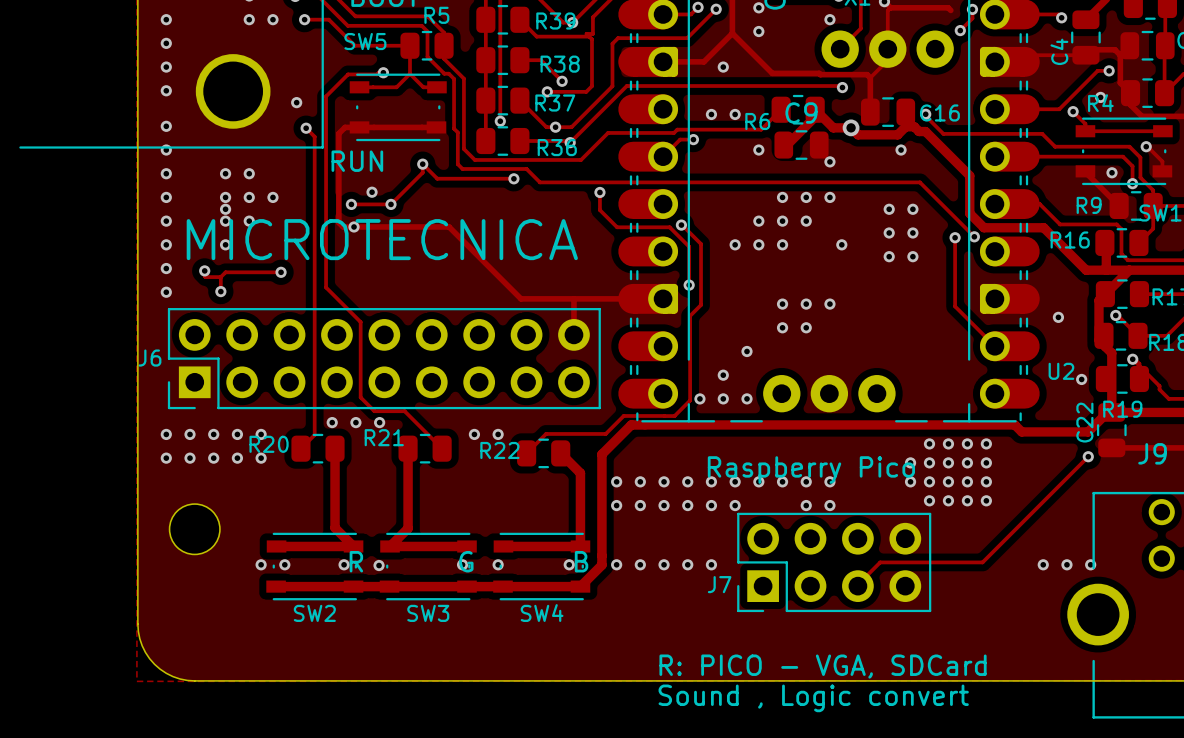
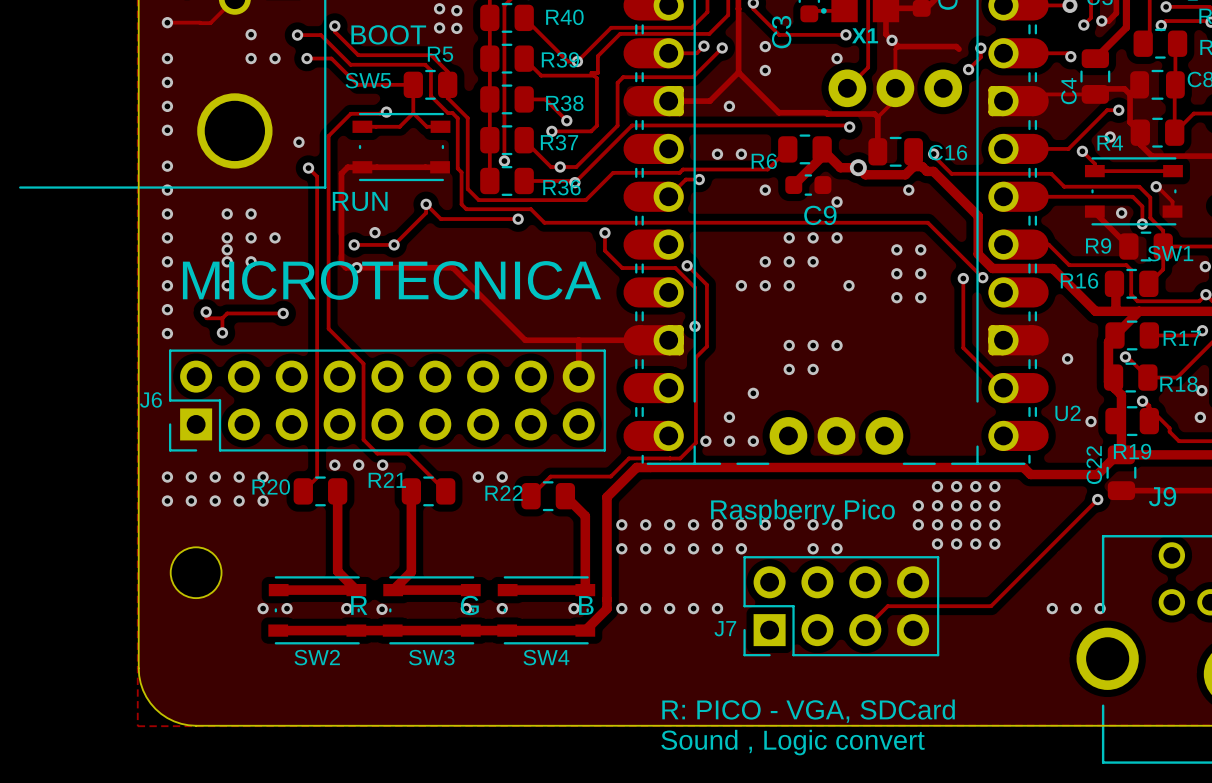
C9 name position: C9 (801, 112) -> C9 (820, 215)
C9 footprint: [774, 130, 829, 160] -> [785, 174, 832, 196]

